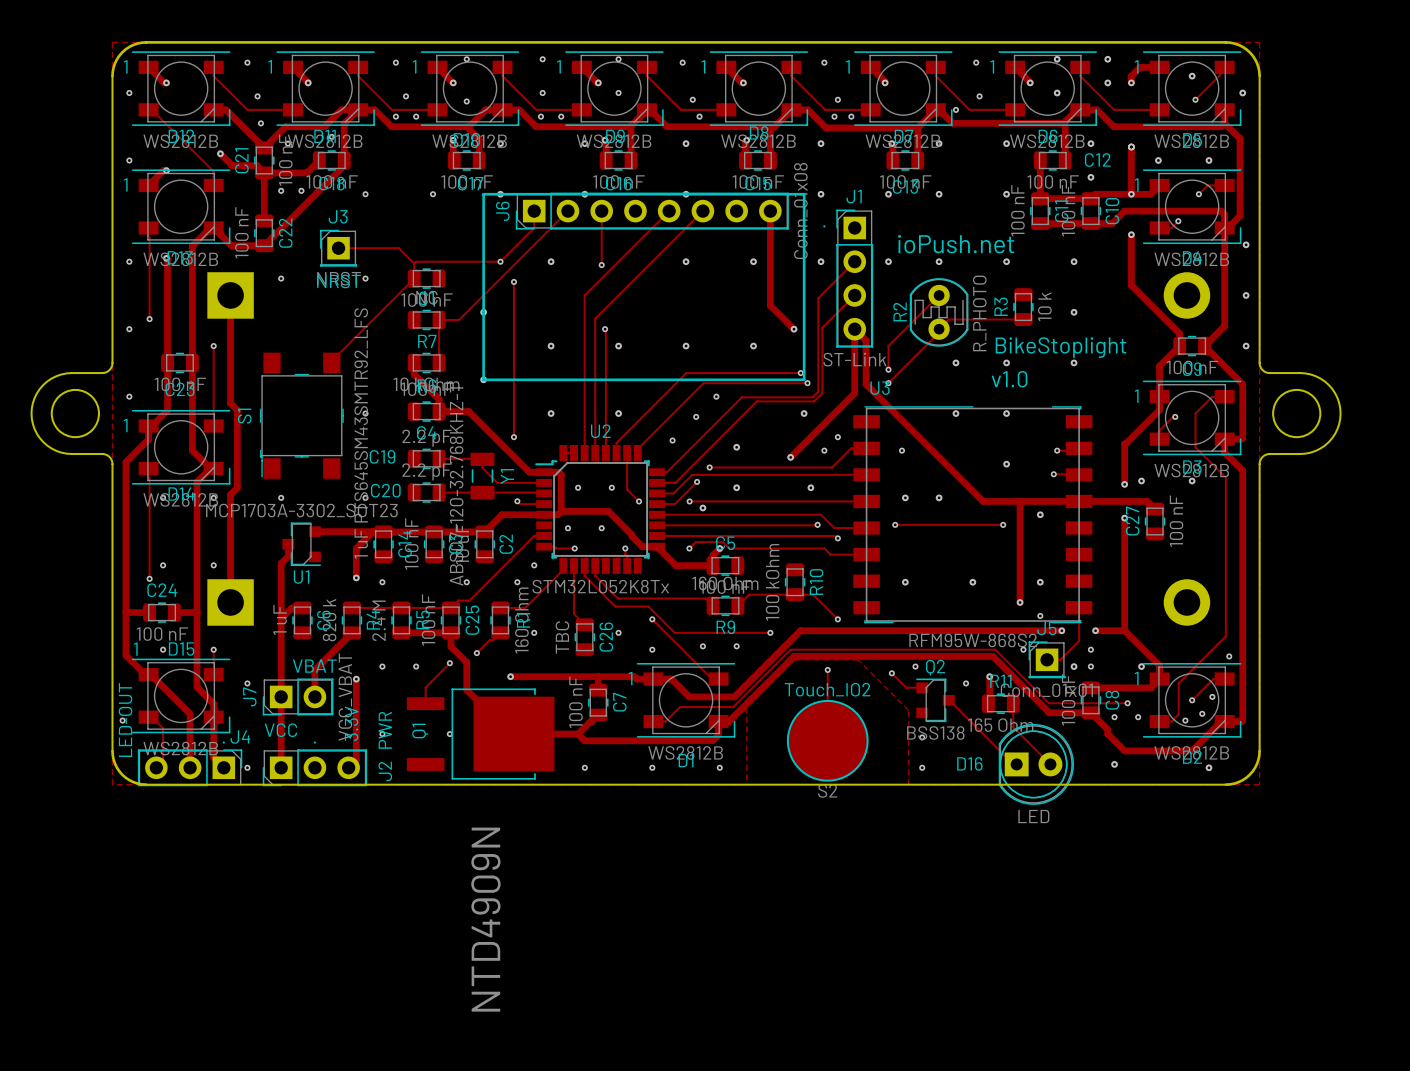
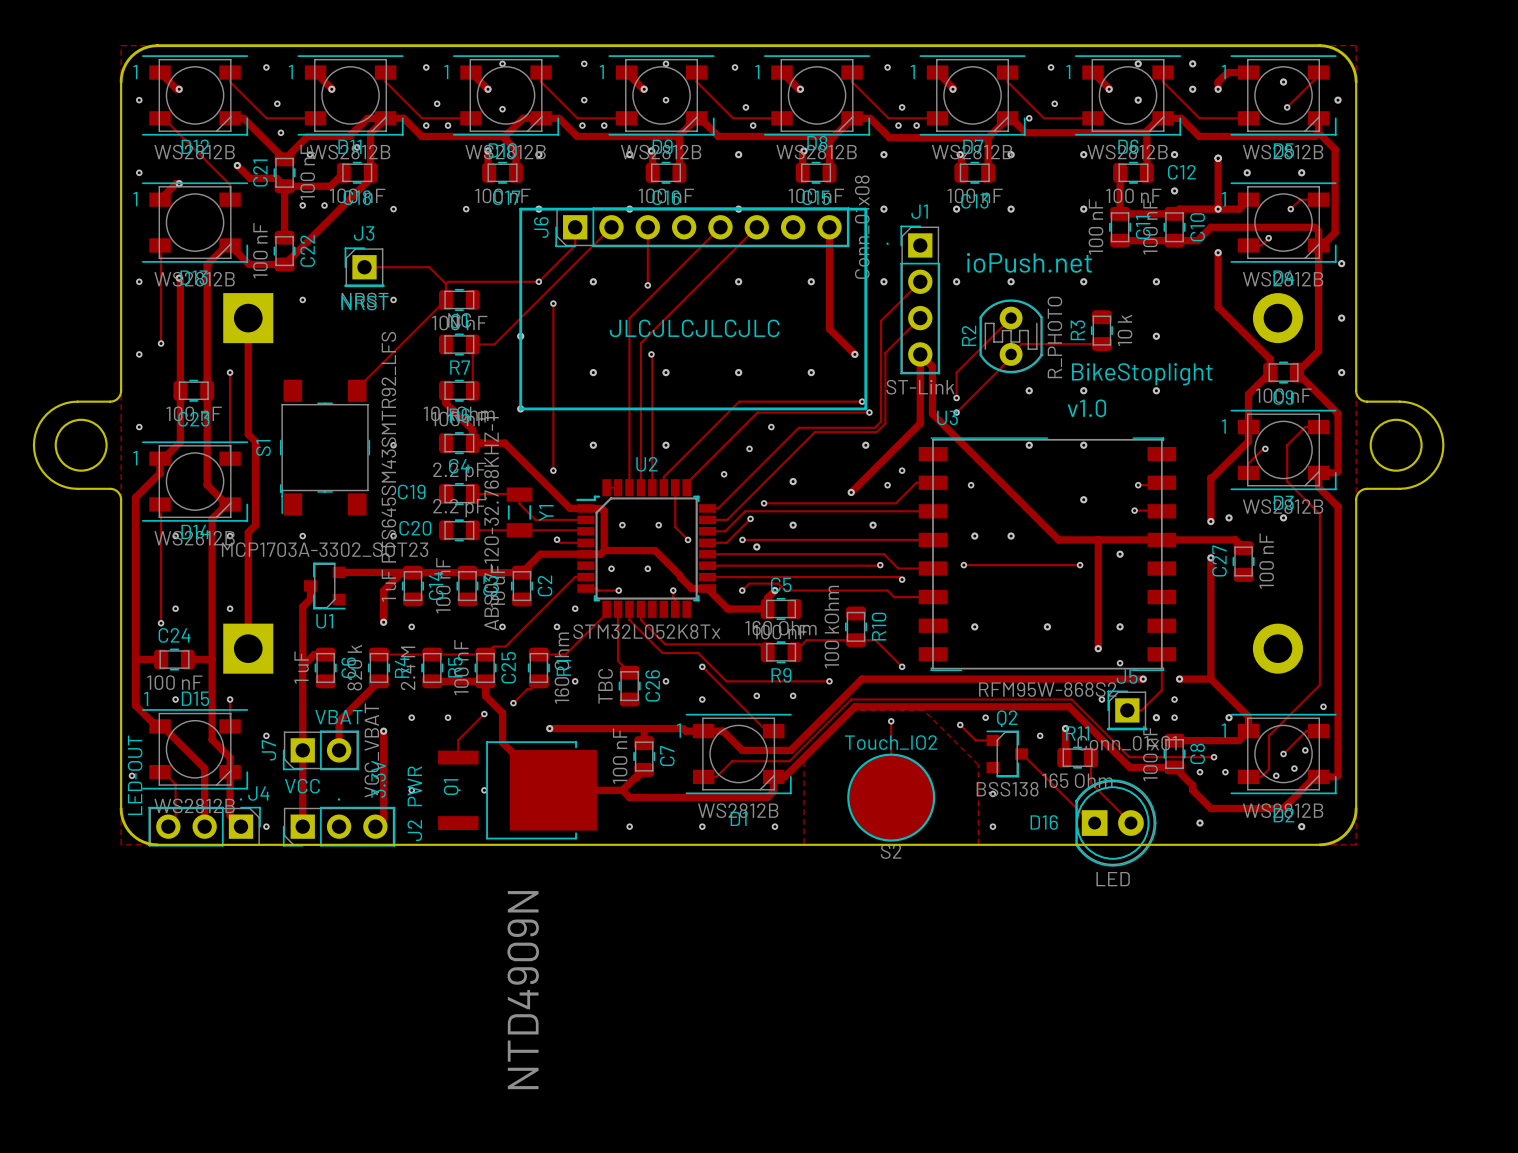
text: none -> JLCJLCJLCJLC (694, 328)

